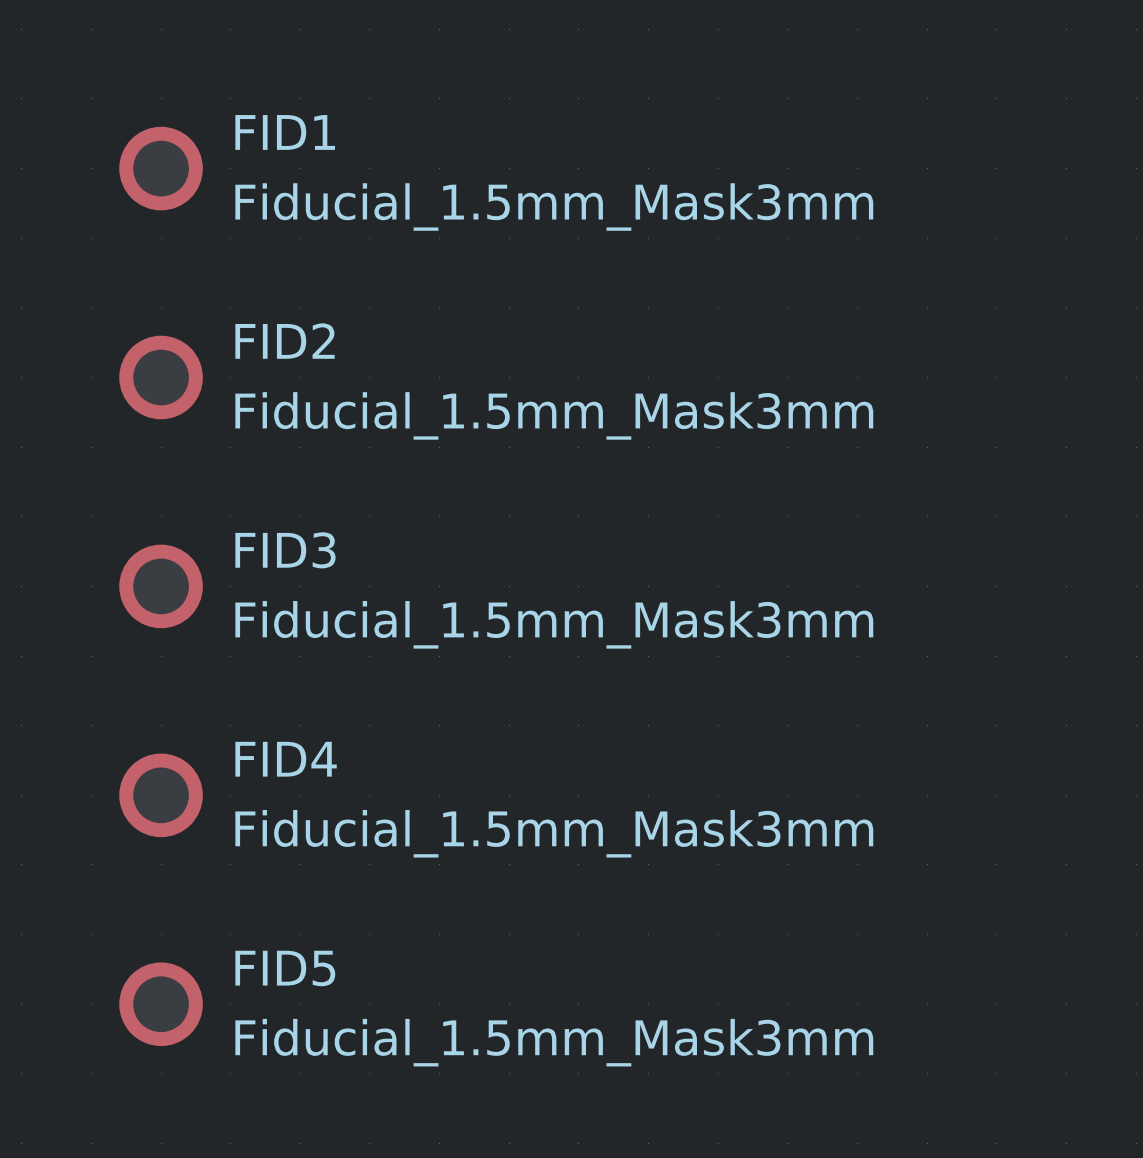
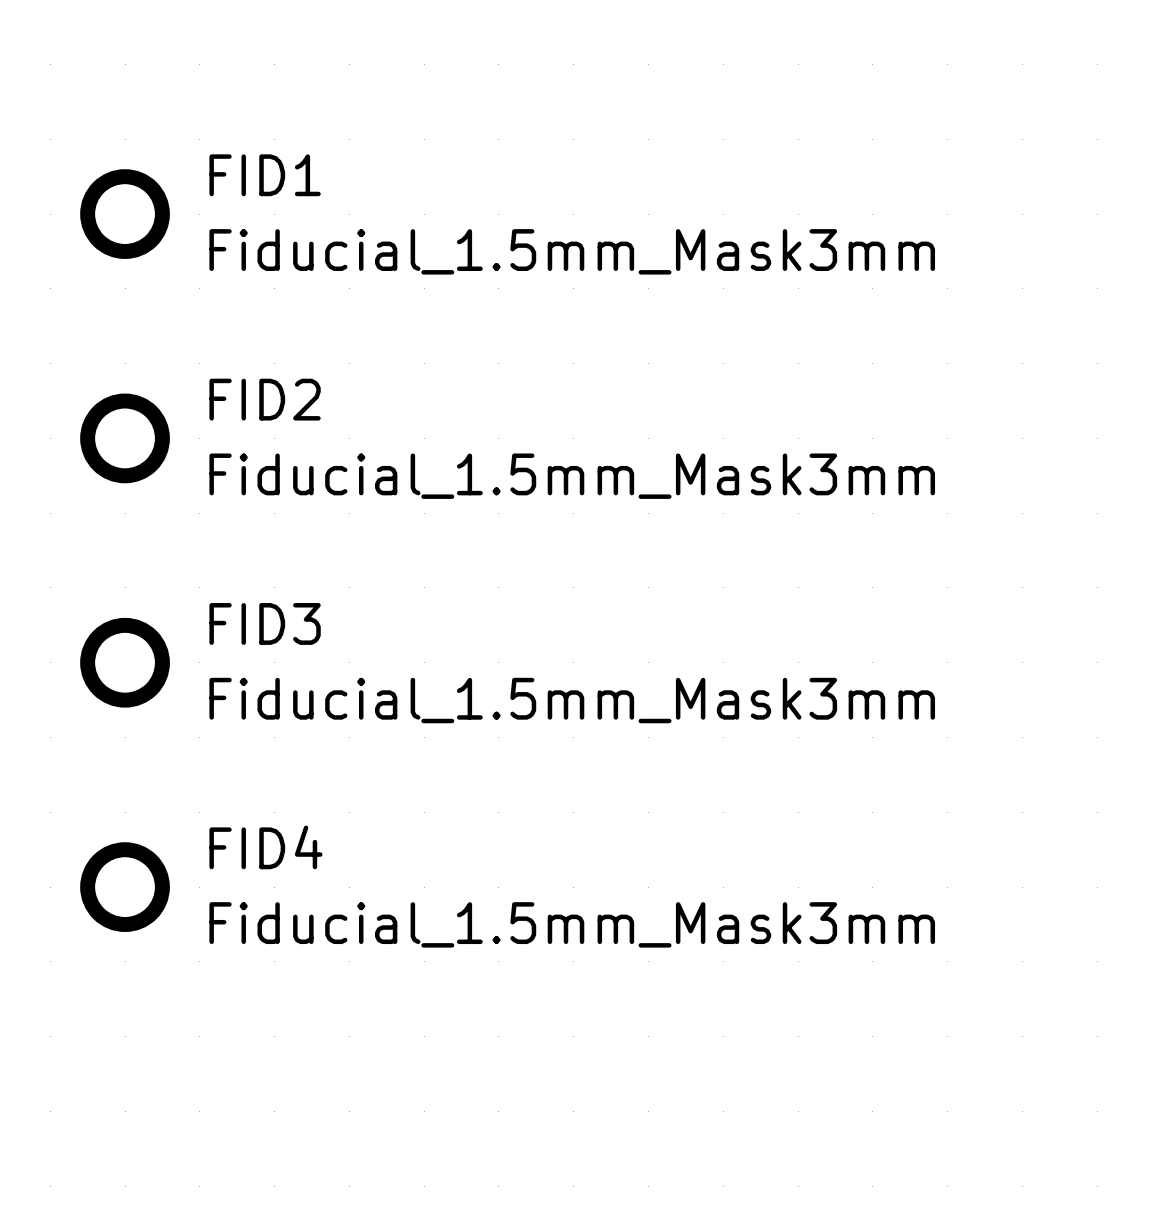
FID5: Fiducial_1.5mm_Mask3mm (161, 1004) -> none

